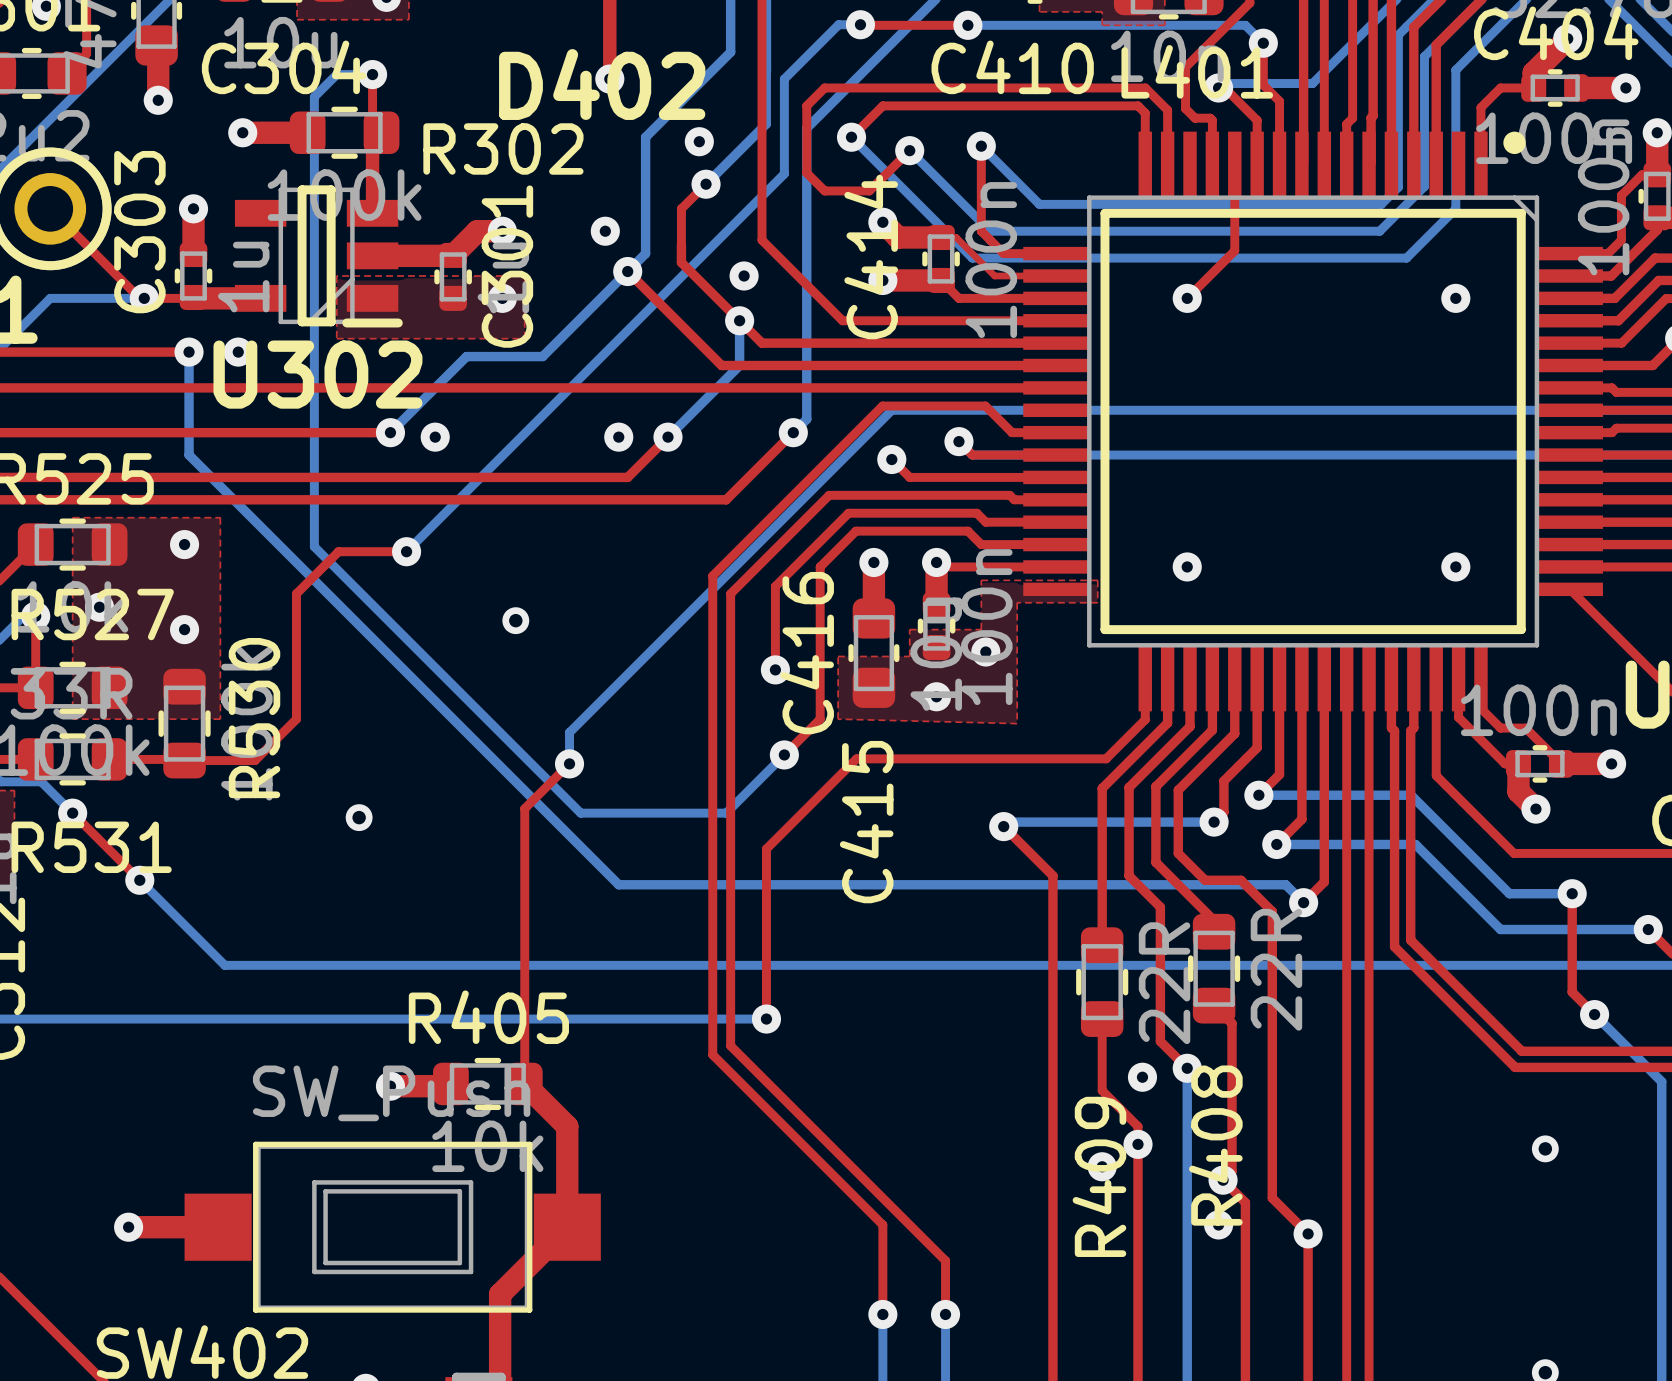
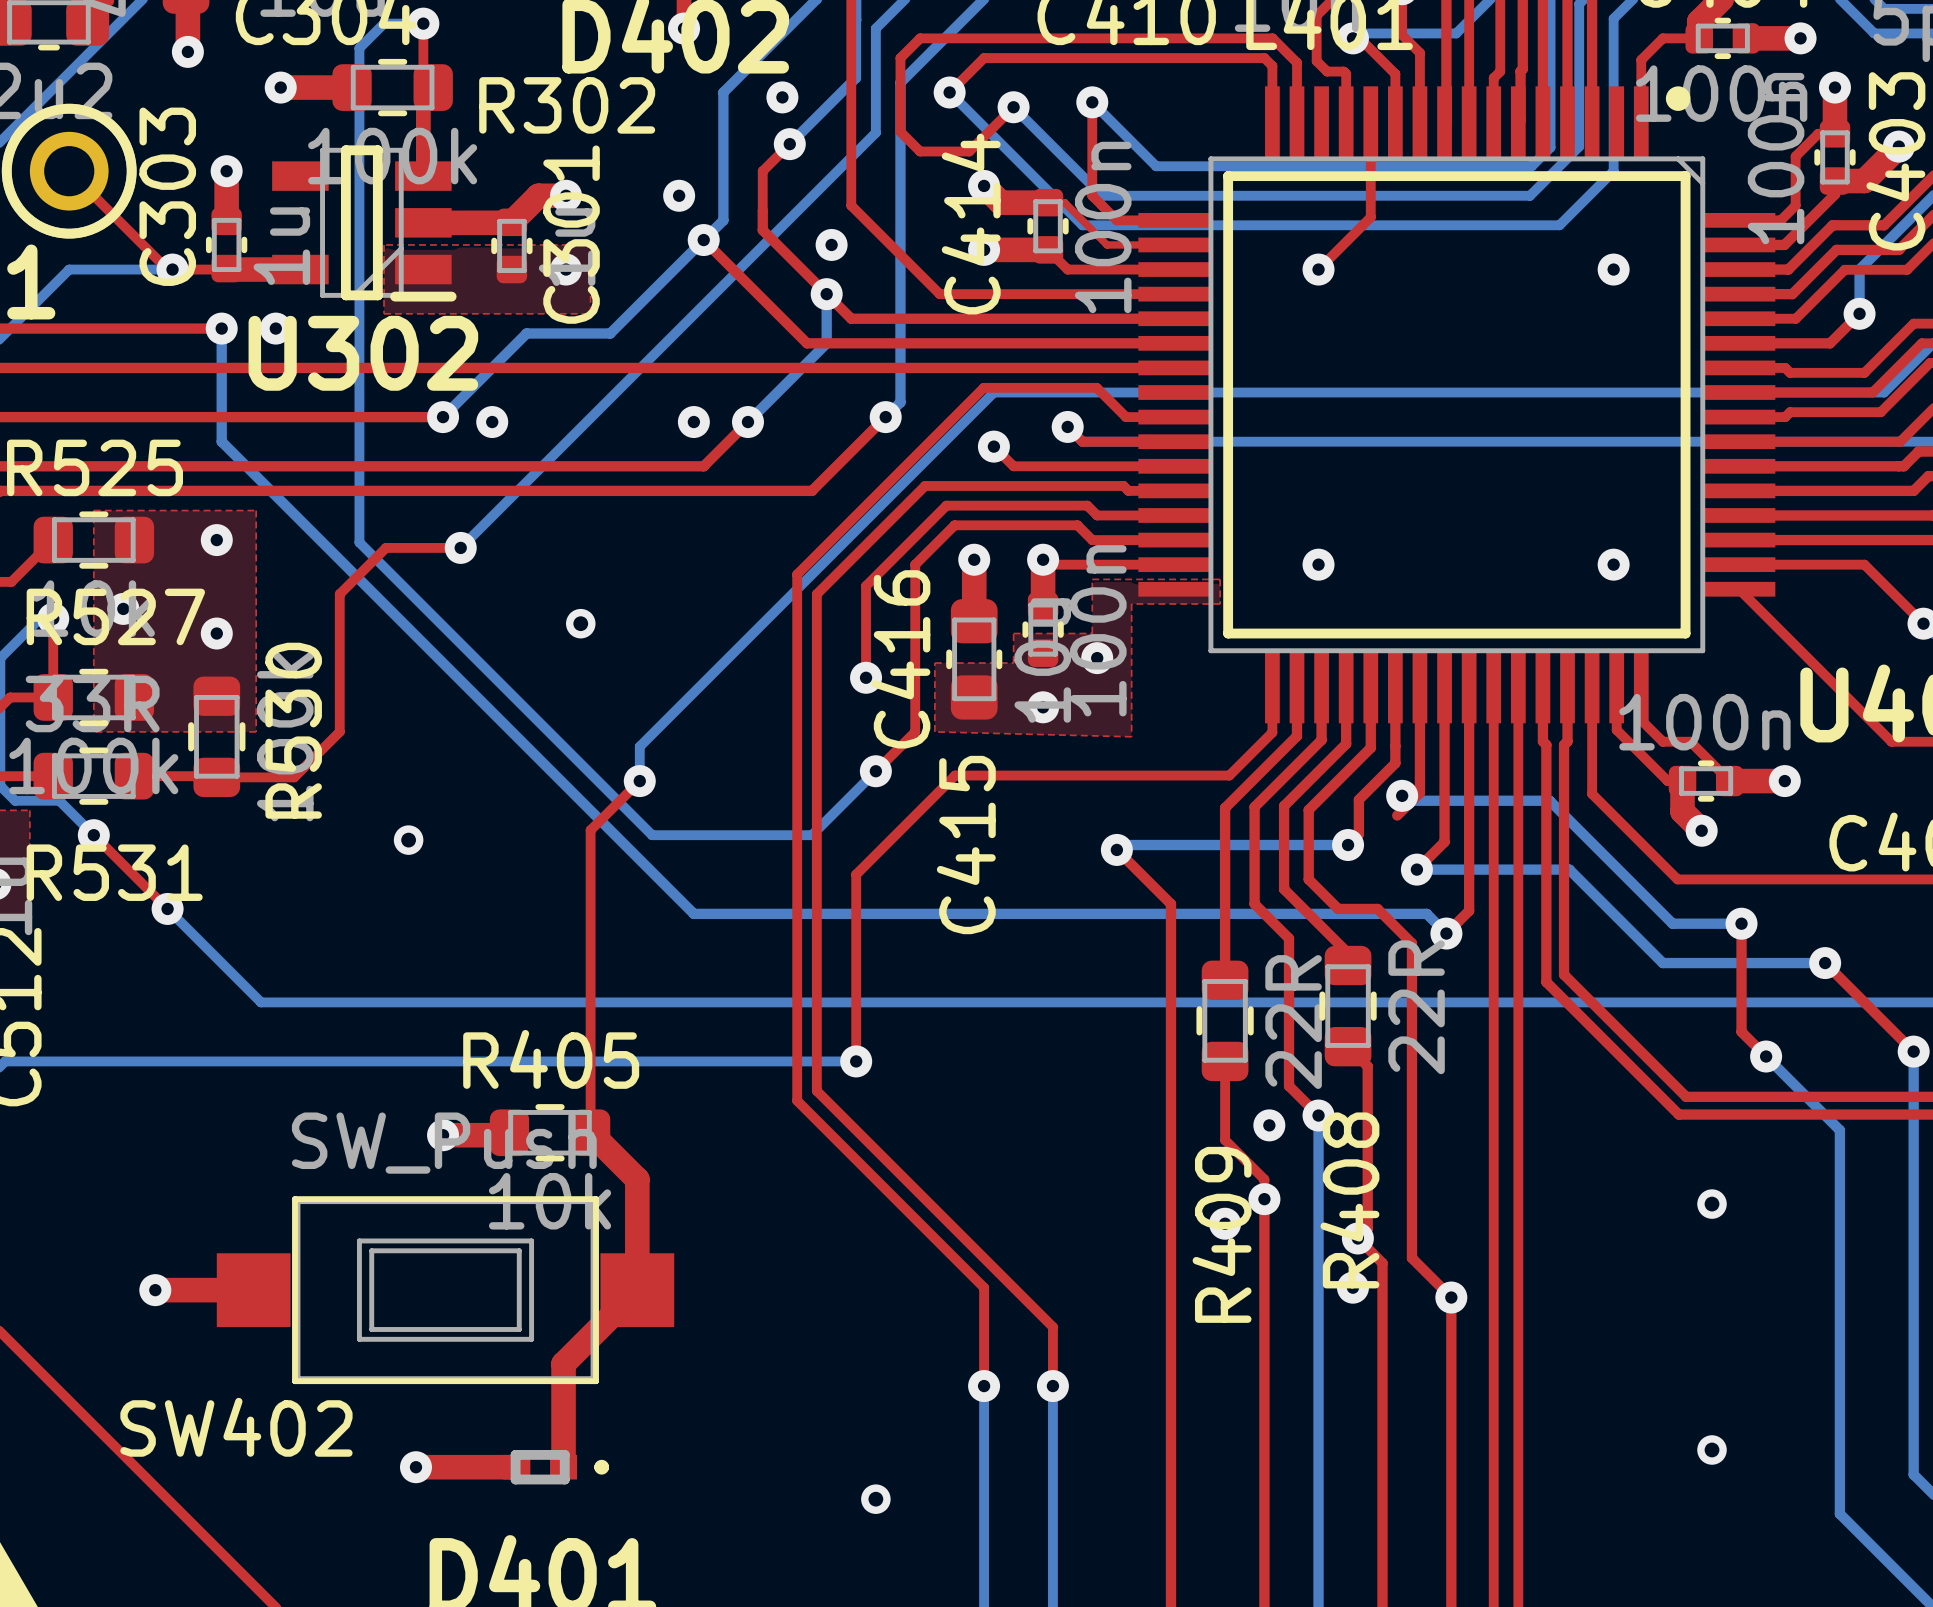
bottom track: (1258, 795) (1411, 795) -> (1402, 795) (1407, 800) (1549, 800) (1564, 815)
via position: (1258, 795) -> (1402, 795)

